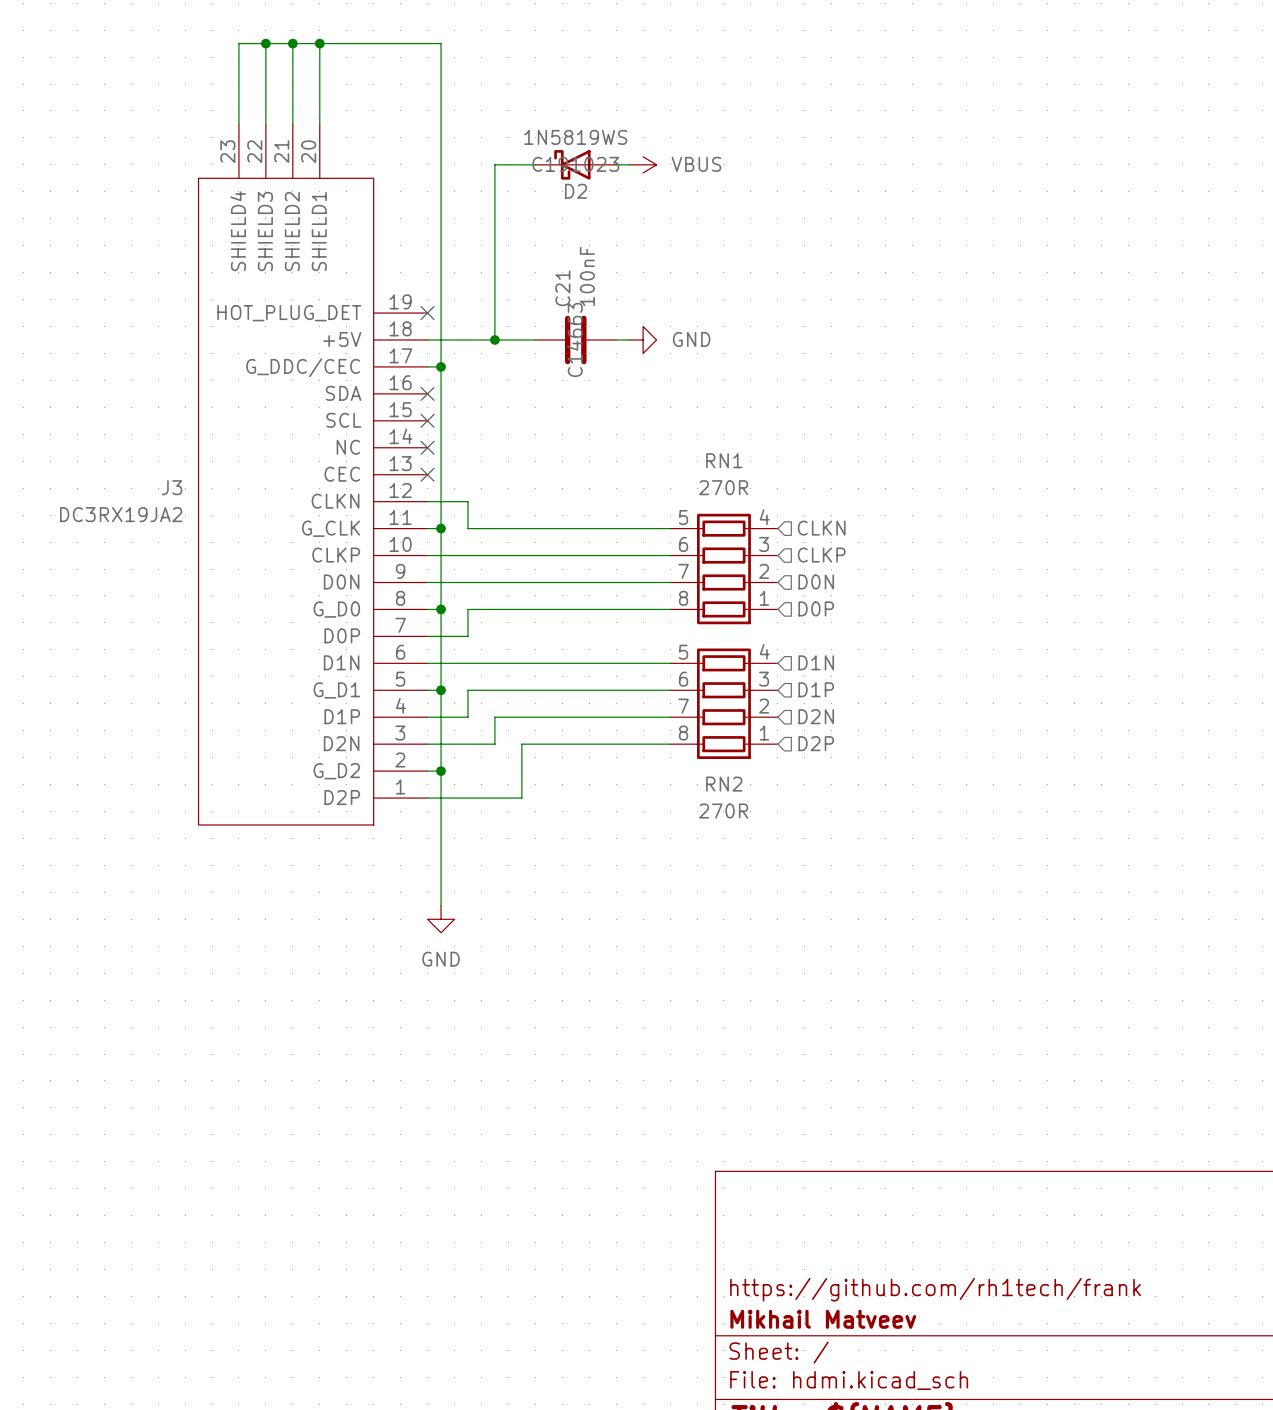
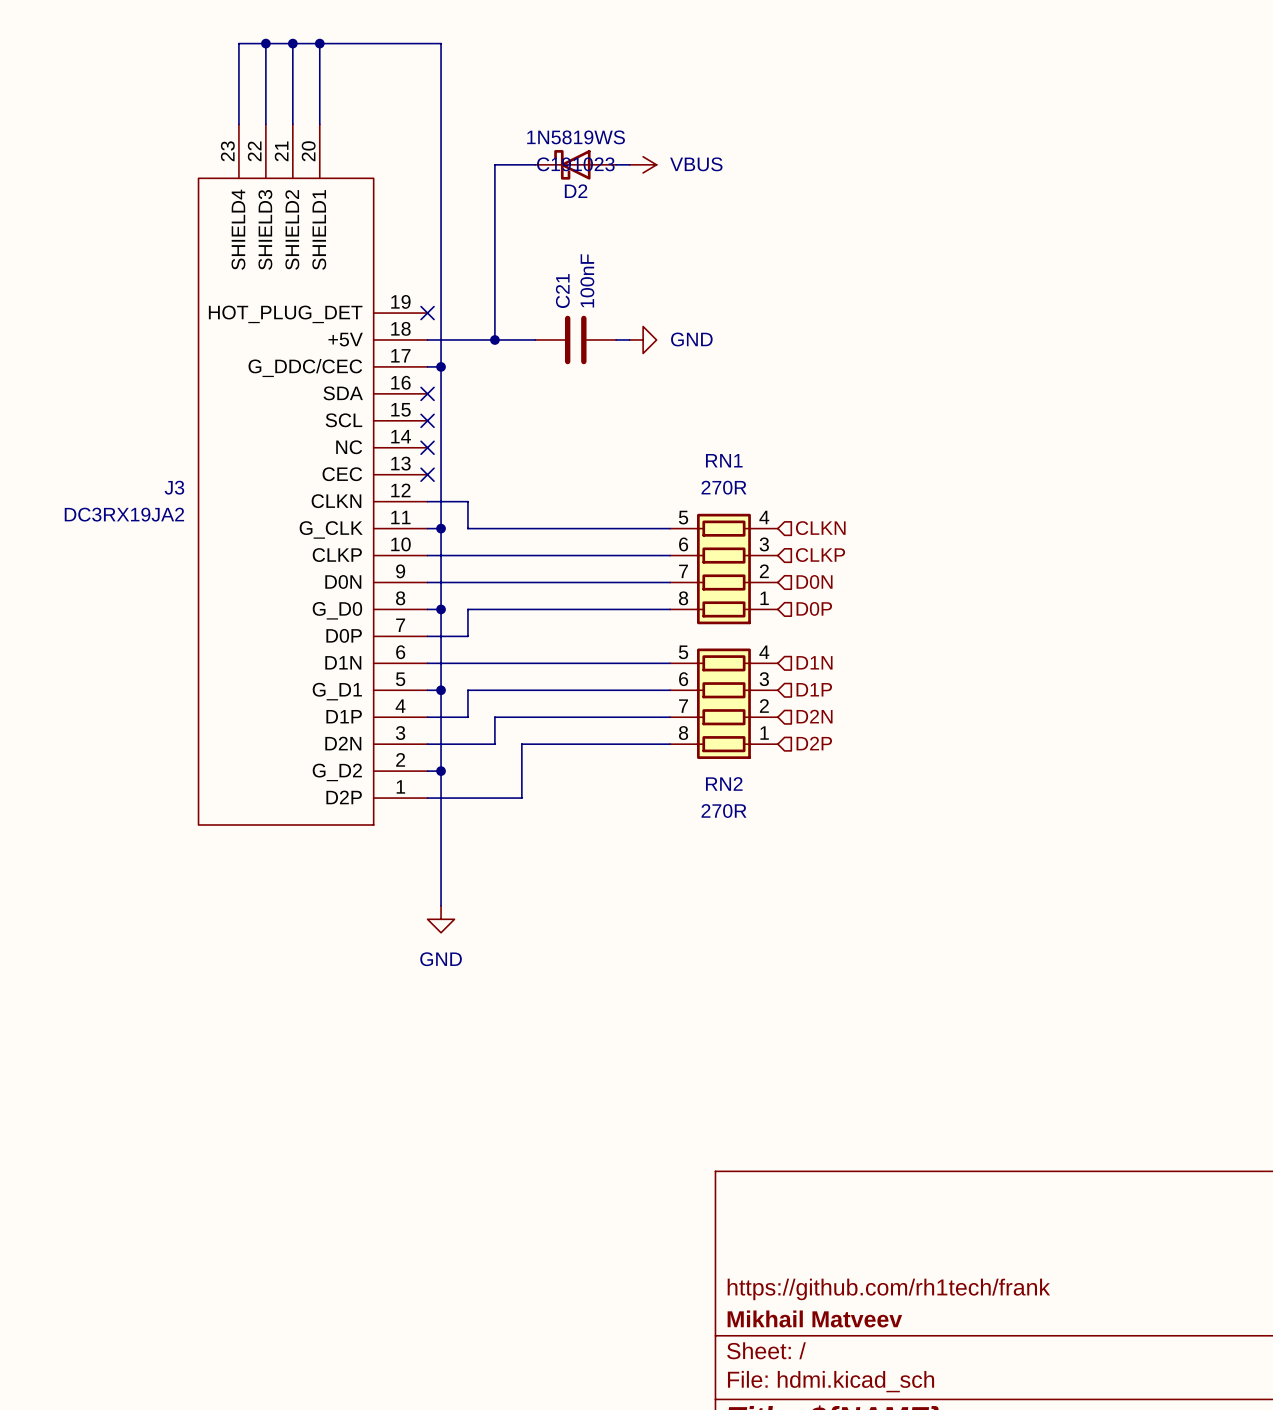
C21 text: C14663 (574, 339) -> none

